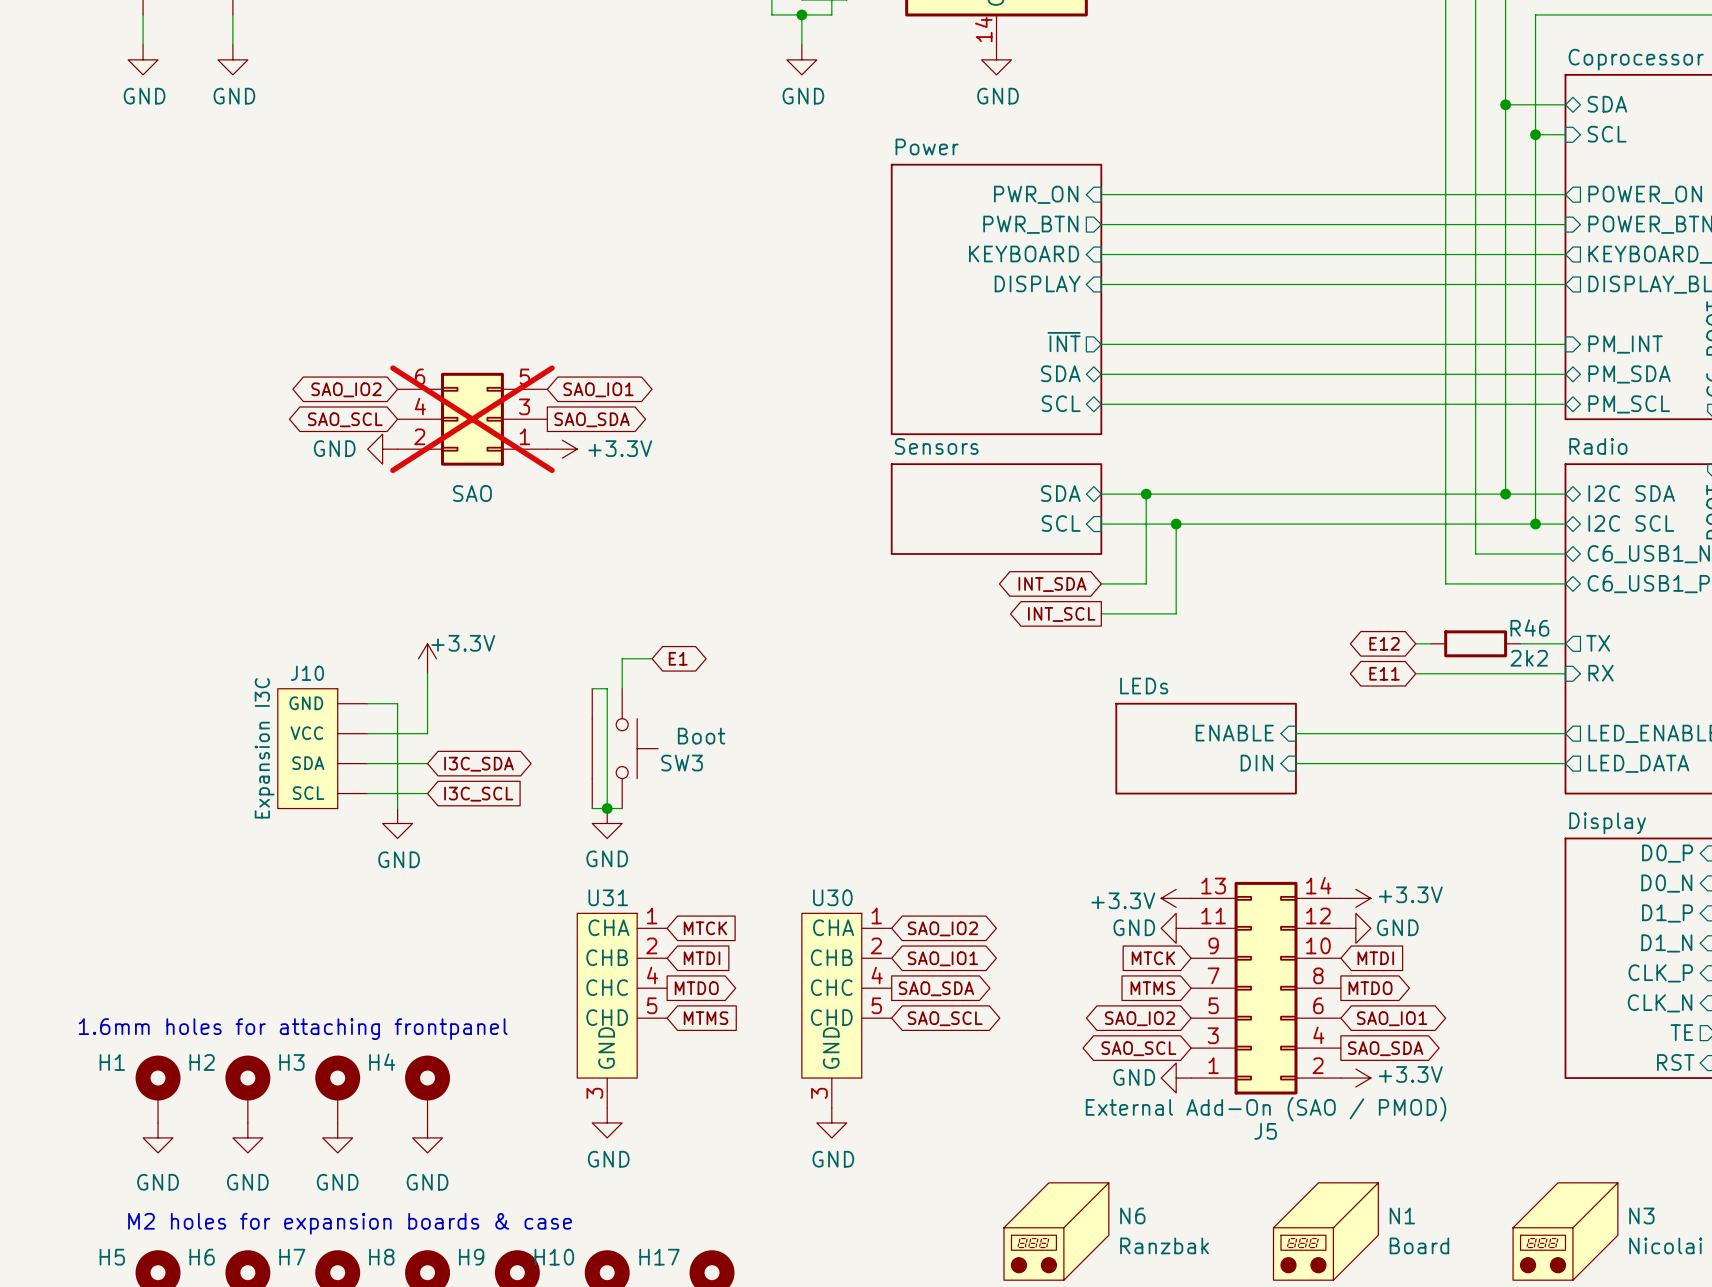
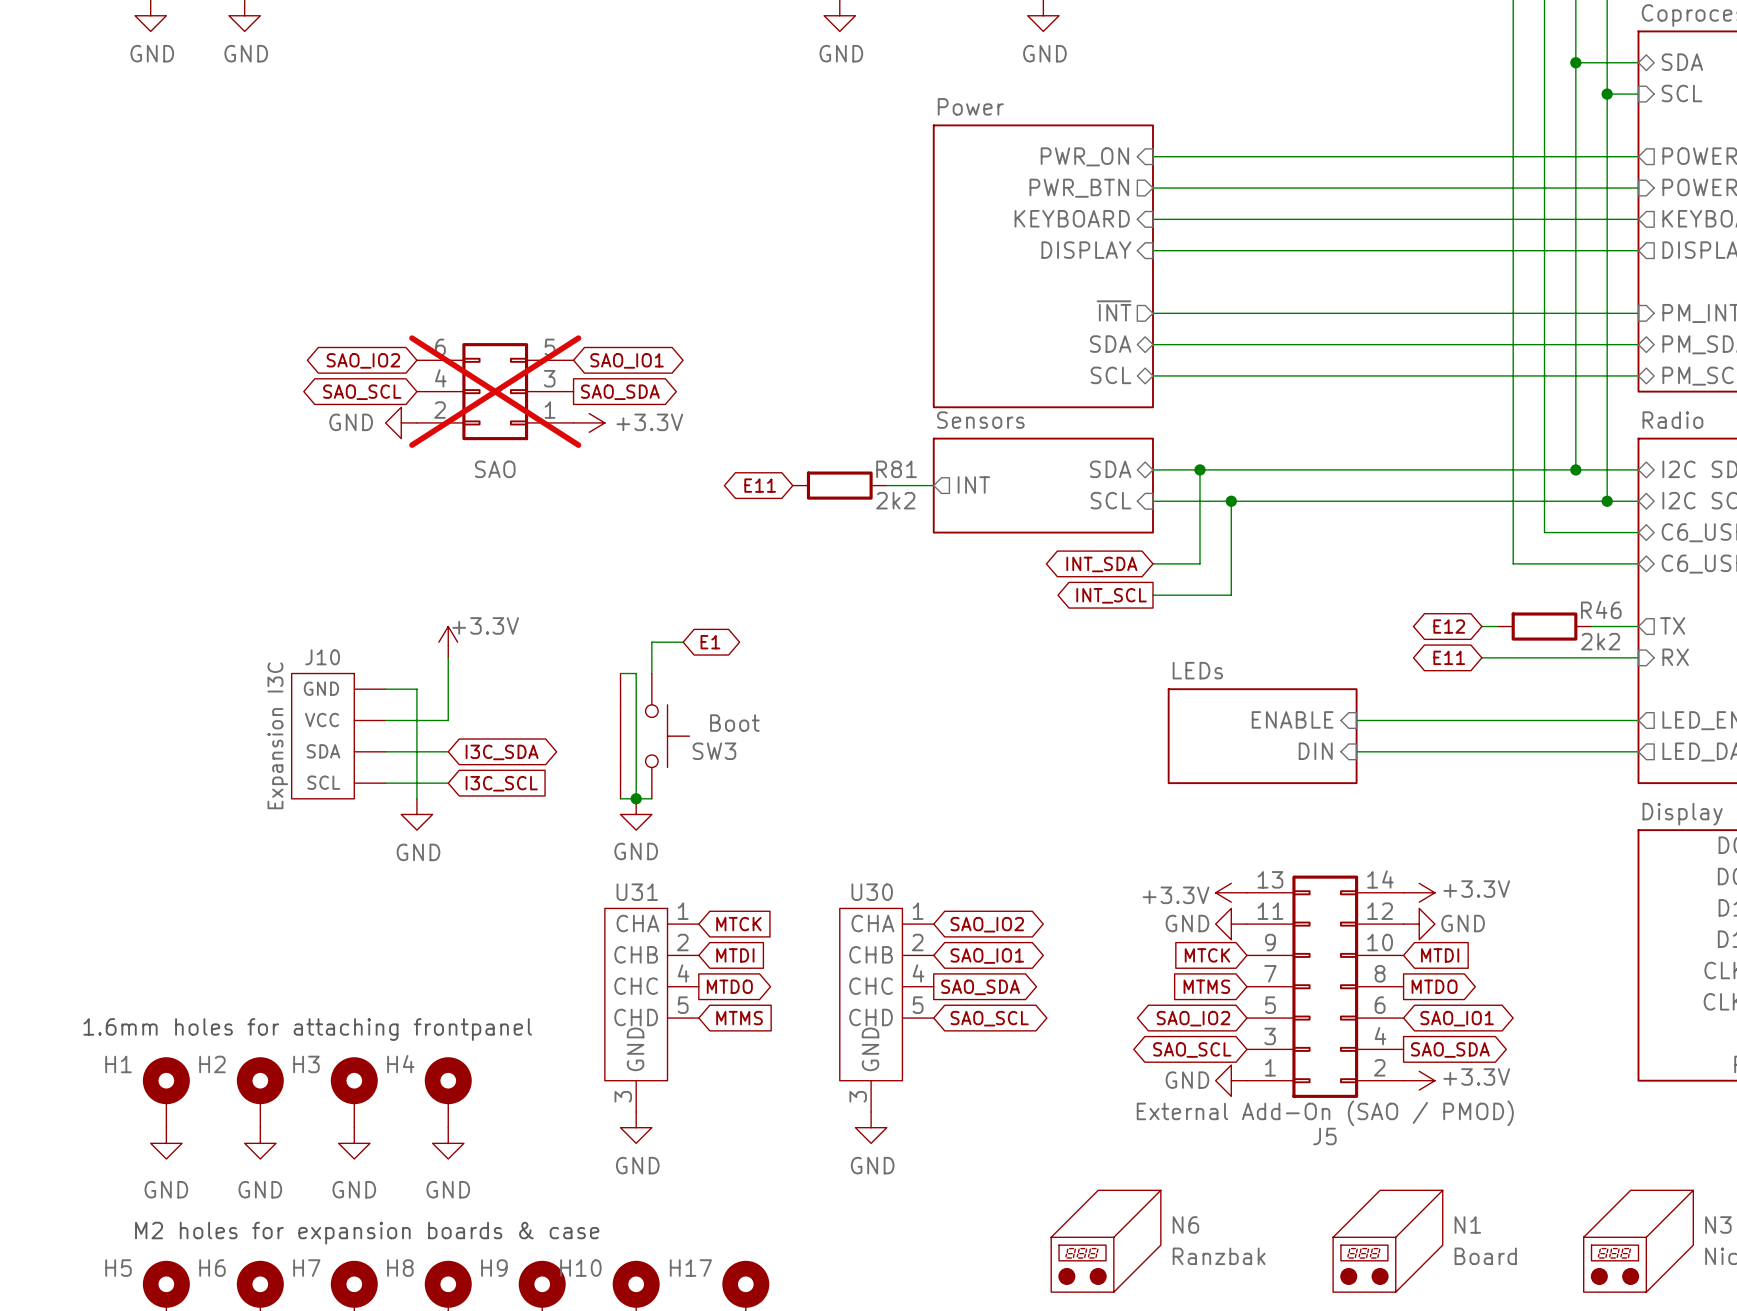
sheet pin: none -> INT (973, 485)
global label: none -> E11 (760, 485)
R81: none -> 2k2 (839, 485)
wire: none -> (886, 485) (933, 485)

